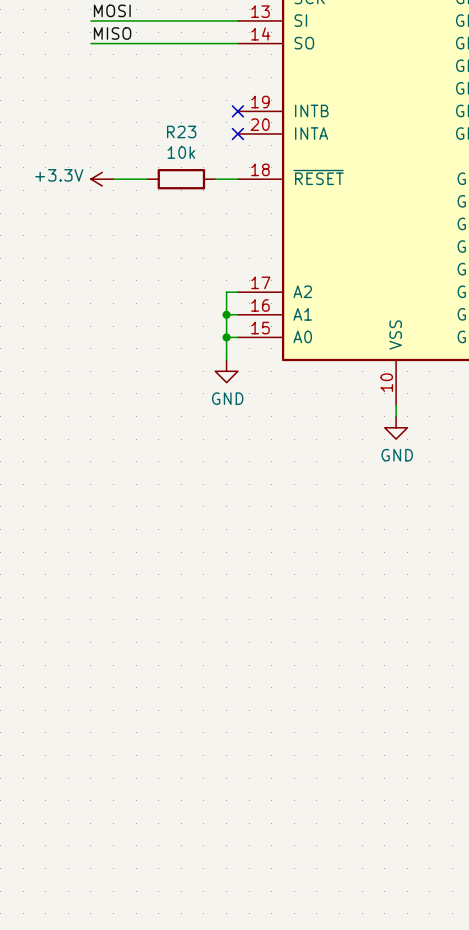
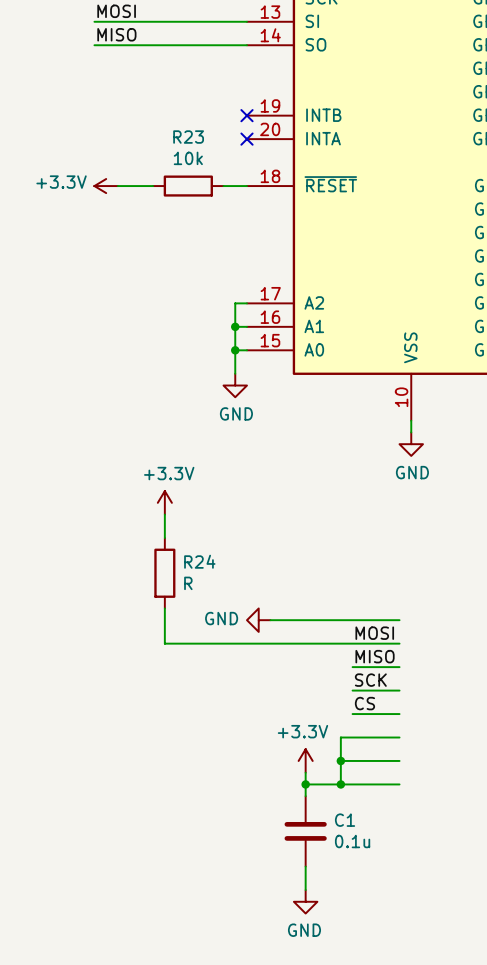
power symbol: none -> +3.3V (164, 502)
wire: none -> (164, 514) (164, 538)
R24: none -> R (164, 573)
wire: none -> (164, 608) (164, 643) (399, 643)
power symbol: none -> GND (258, 620)
wire: none -> (270, 620) (399, 620)
label: none -> MOSI (374, 633)
label: none -> MISO (375, 656)
wire: none -> (352, 667) (399, 667)
label: none -> SCK (370, 680)
wire: none -> (352, 690) (399, 690)
label: none -> CS (364, 703)
wire: none -> (352, 714) (399, 714)
wire: none -> (399, 737) (340, 737) (340, 784)
power symbol: none -> +3.3V (305, 760)
wire: none -> (340, 760) (399, 760)
junction: none -> (340, 760)
wire: none -> (305, 772) (305, 796)
wire: none -> (305, 784) (399, 784)
junction: none -> (305, 784)
junction: none -> (340, 784)
C1: none -> 0.1u (305, 831)
wire: none -> (305, 866) (305, 890)
power symbol: none -> GND (305, 901)

